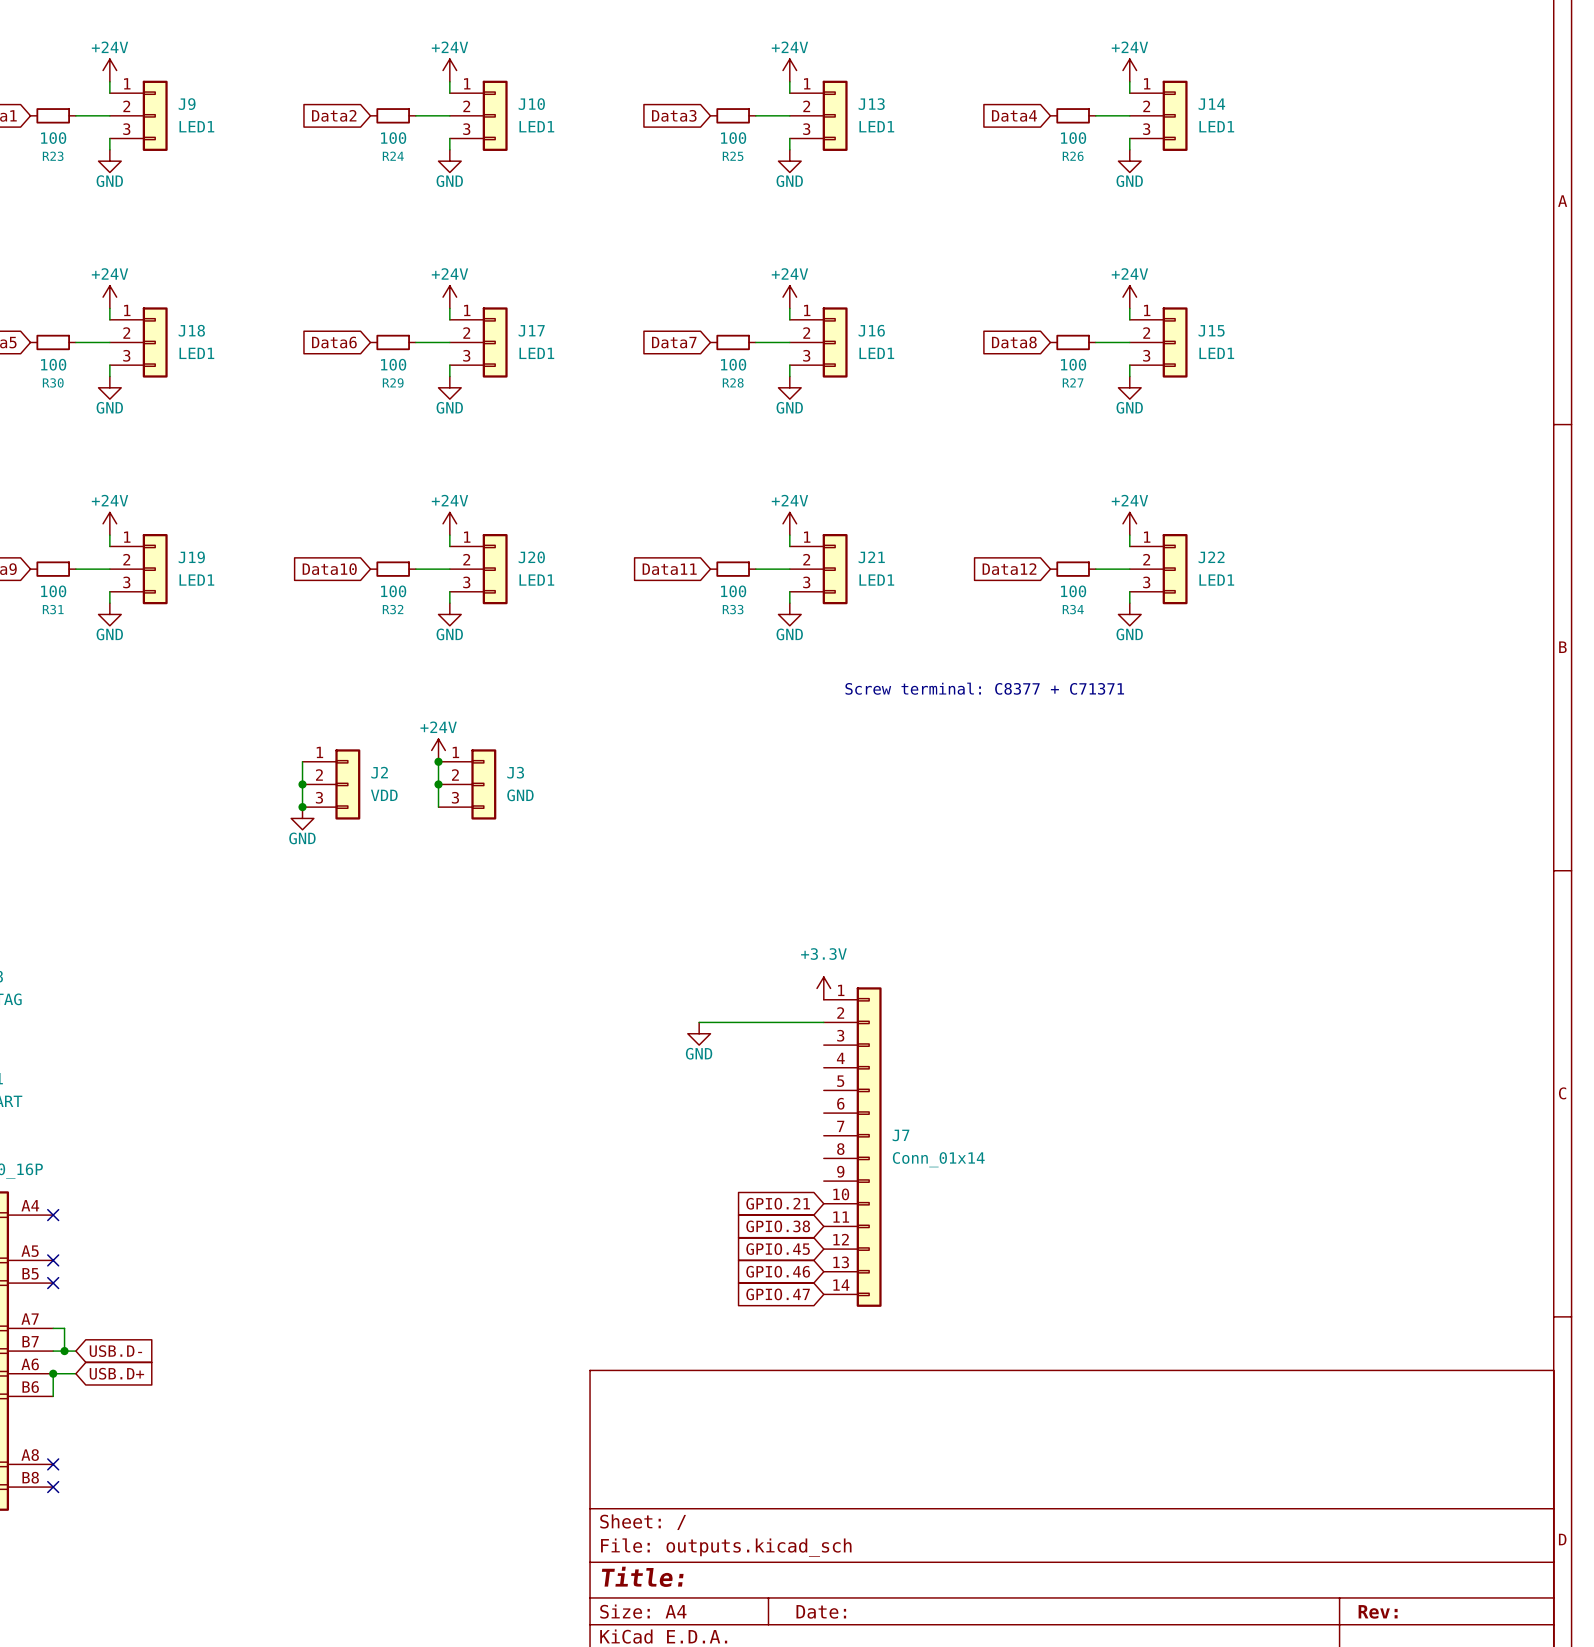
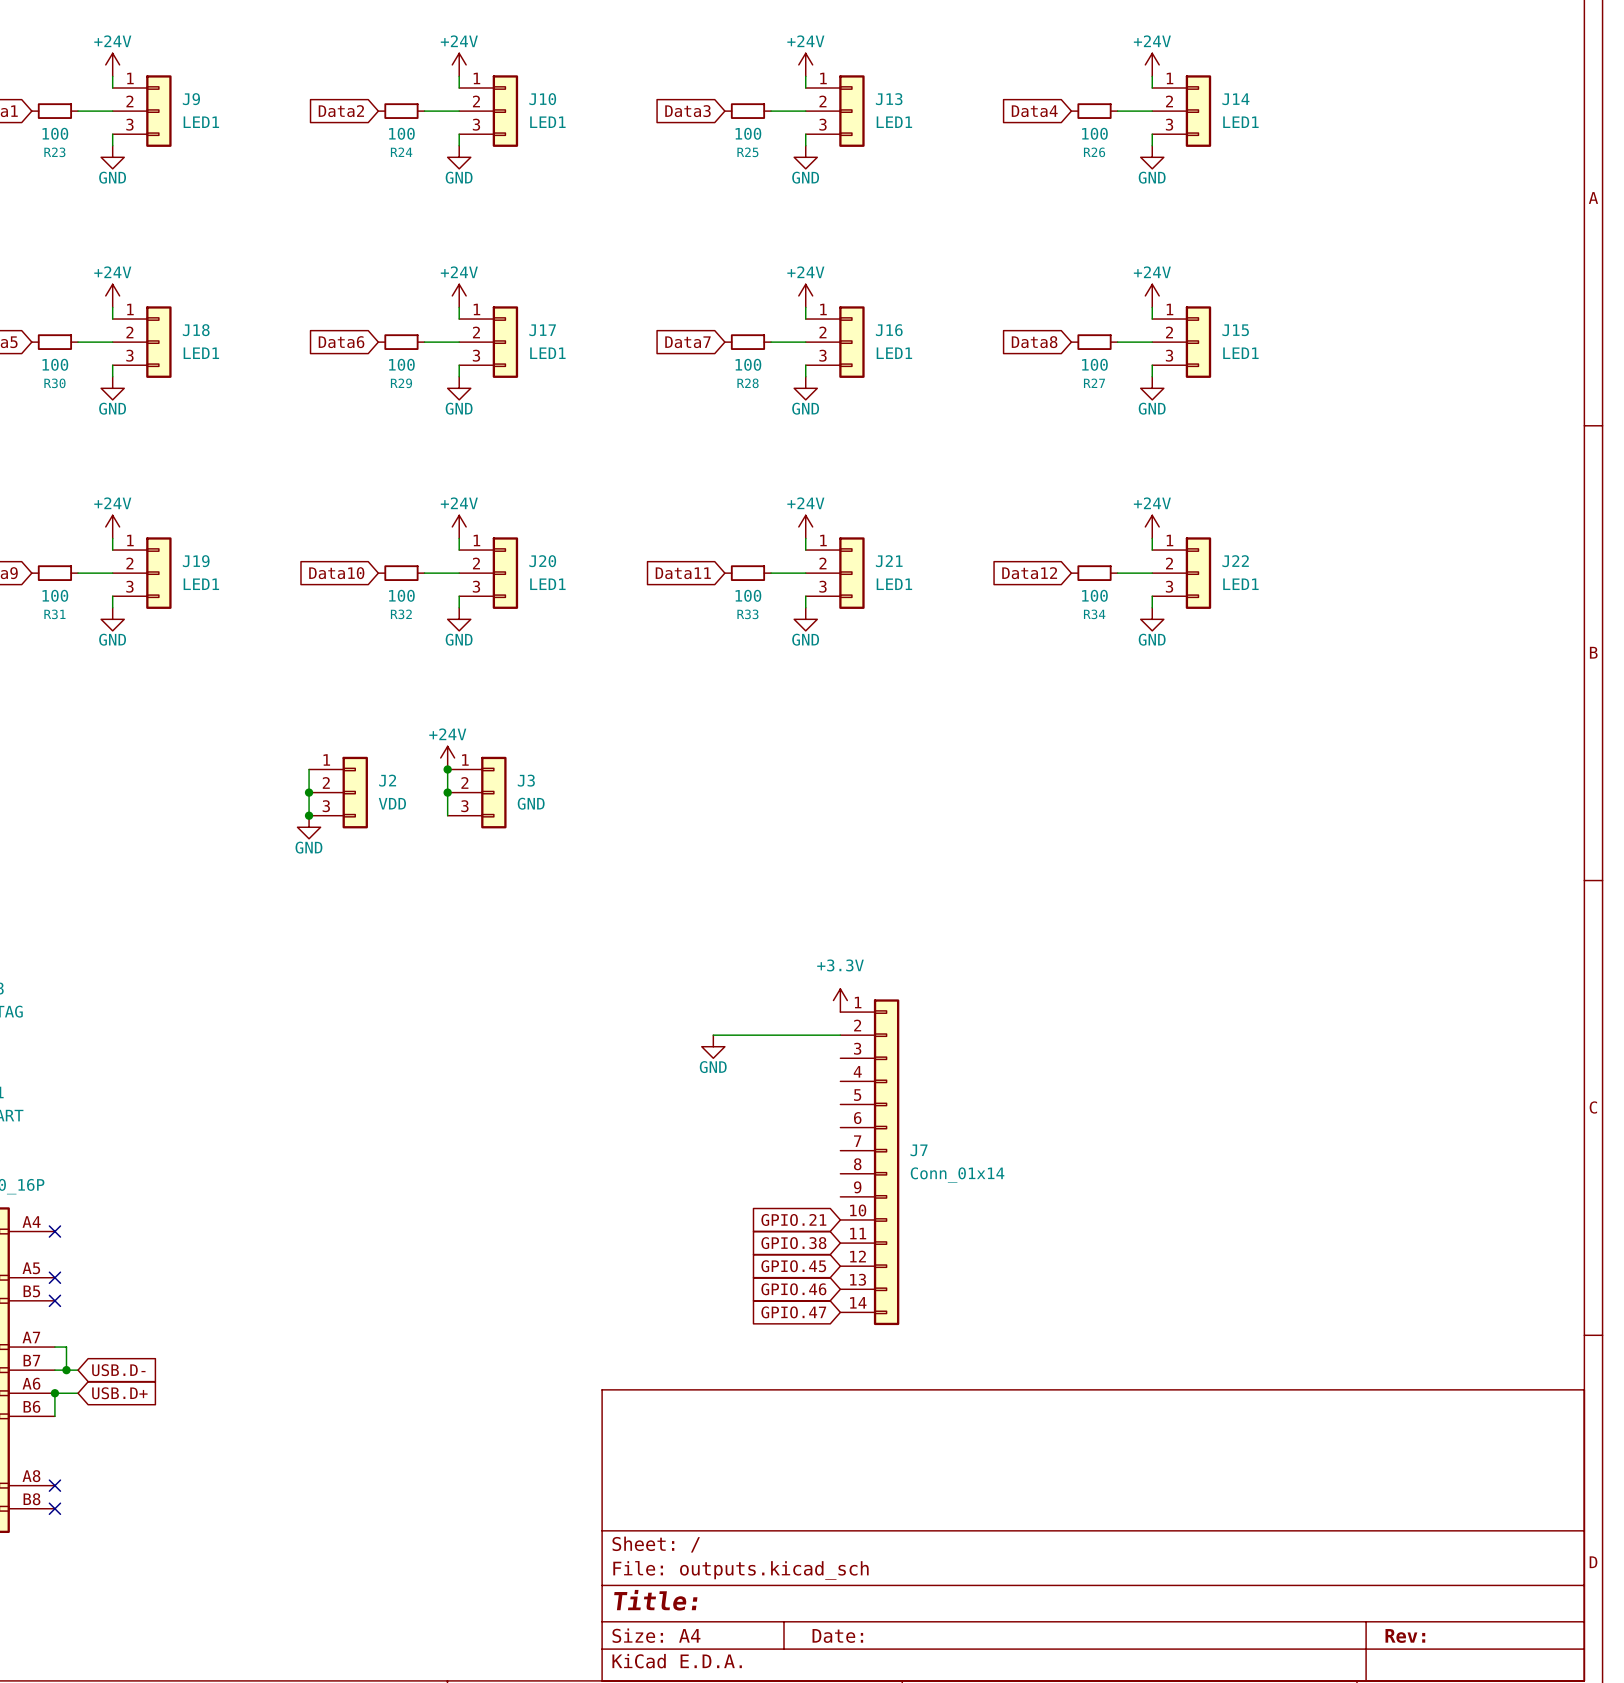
text: Screw terminal: C8377 + C71371 (984, 688) -> none

